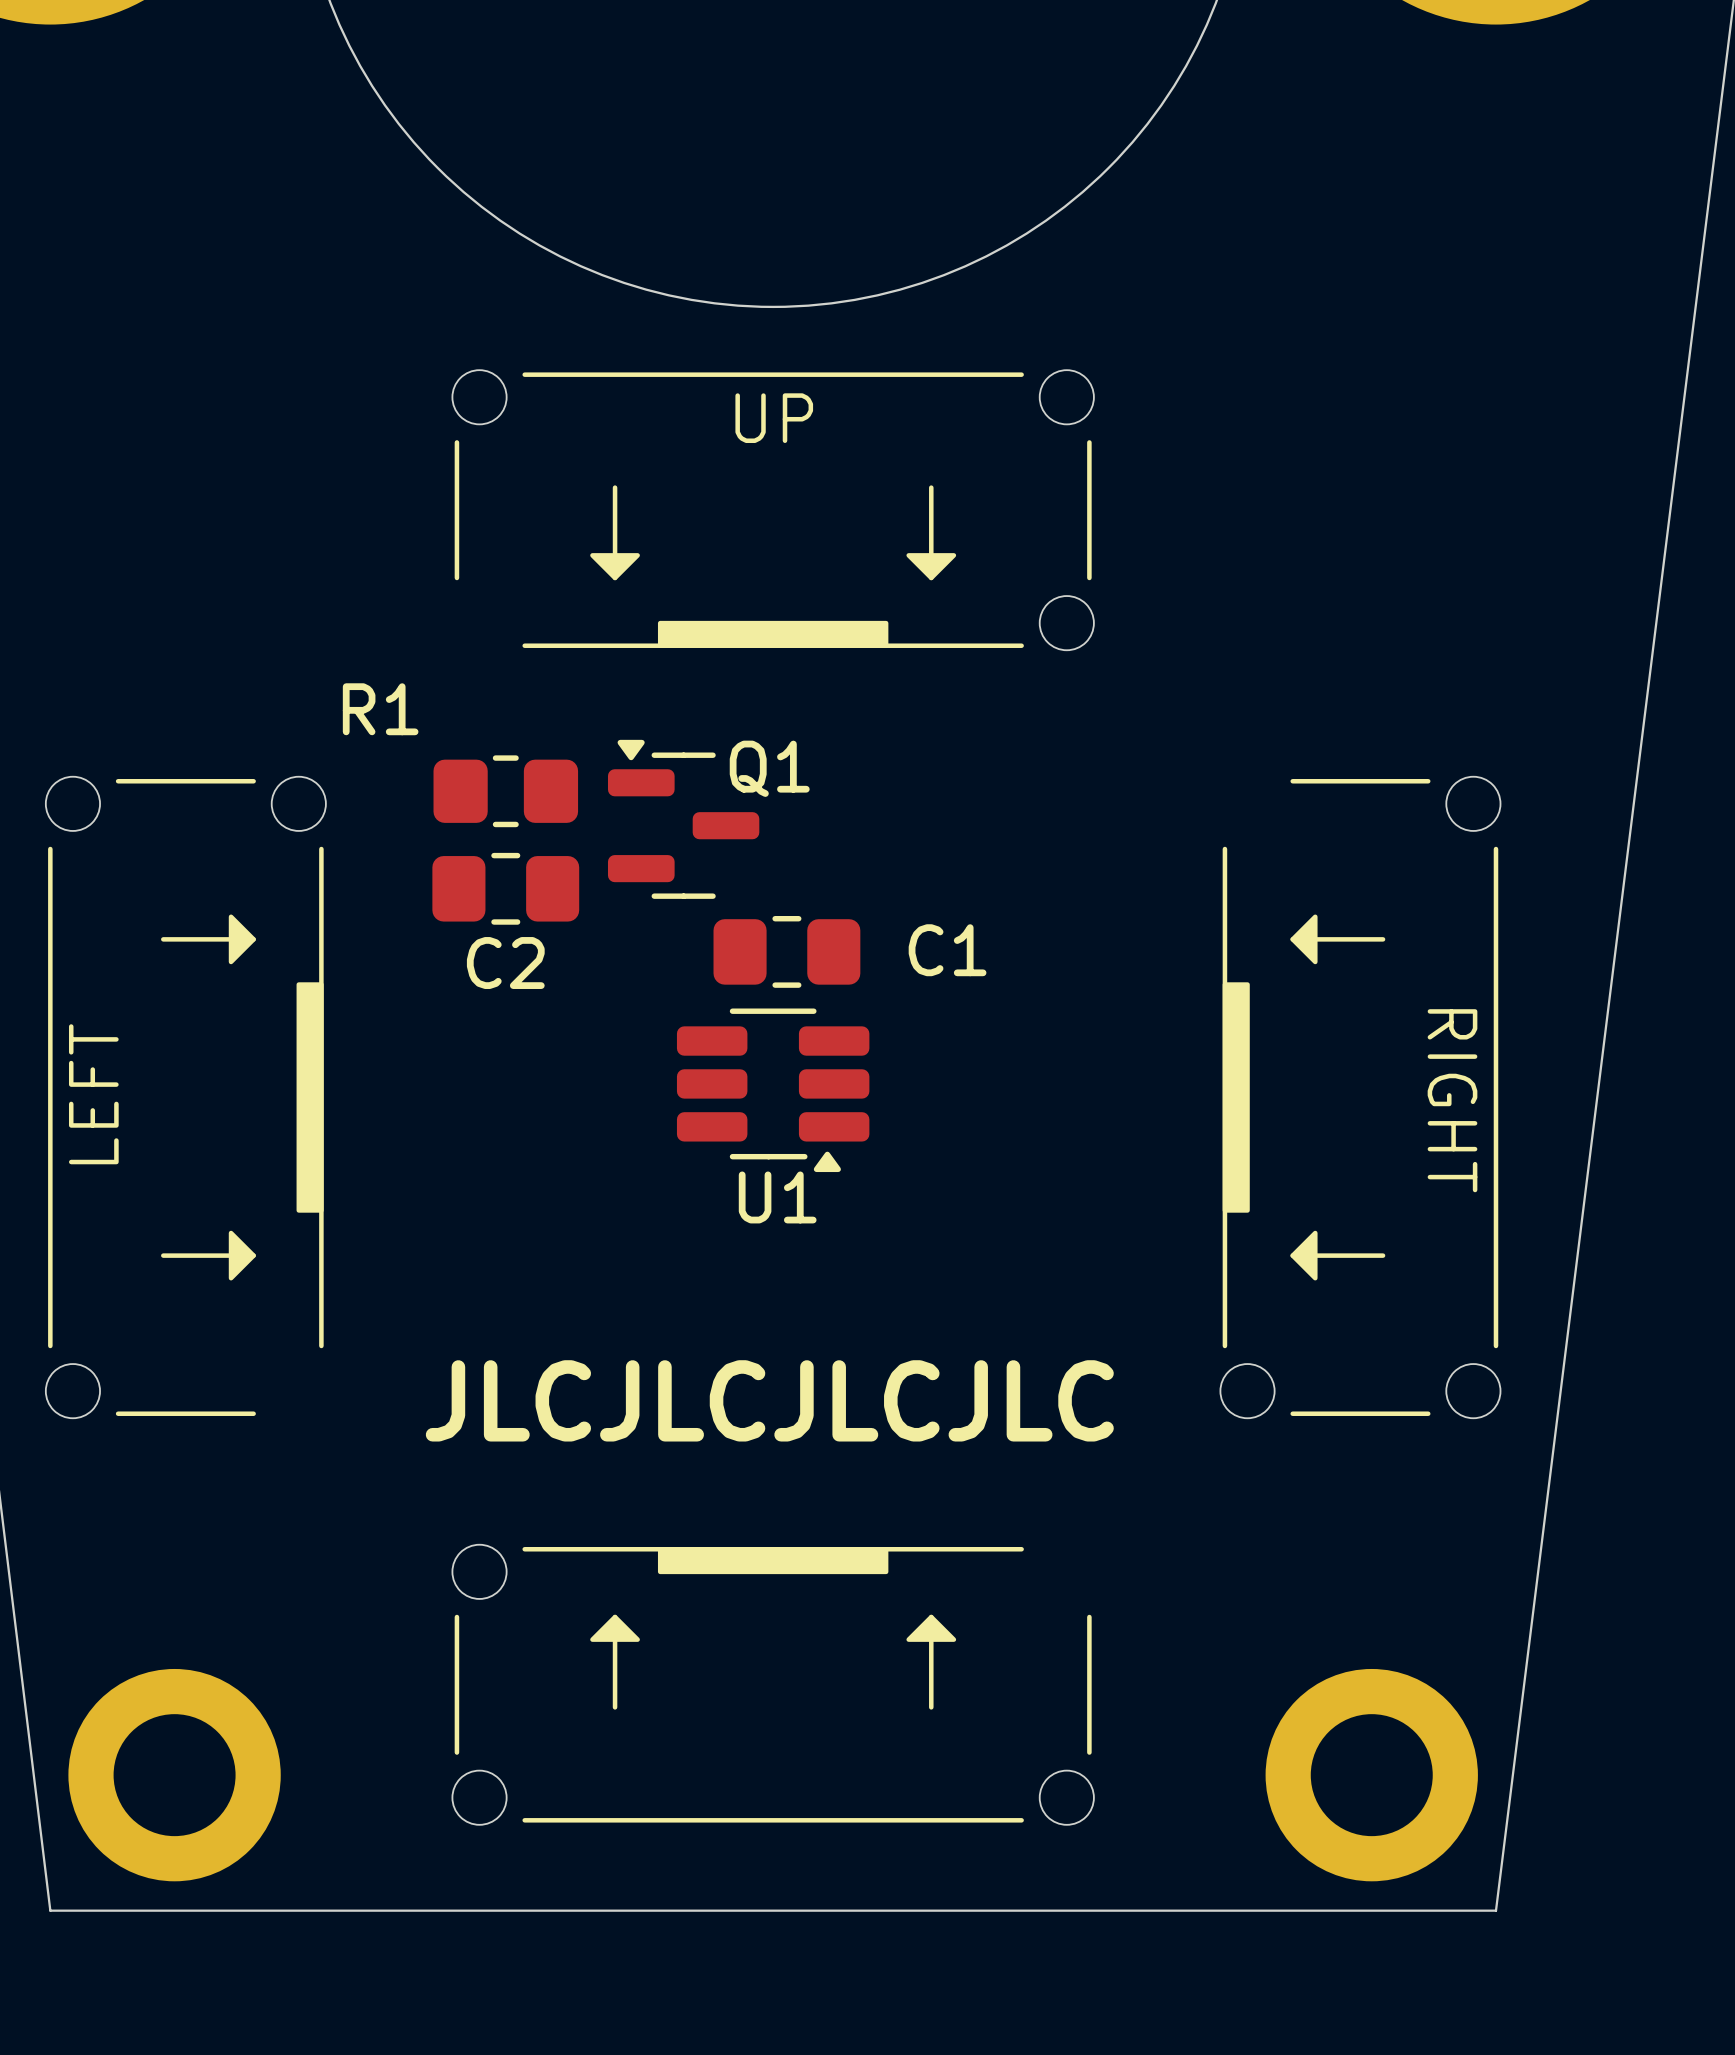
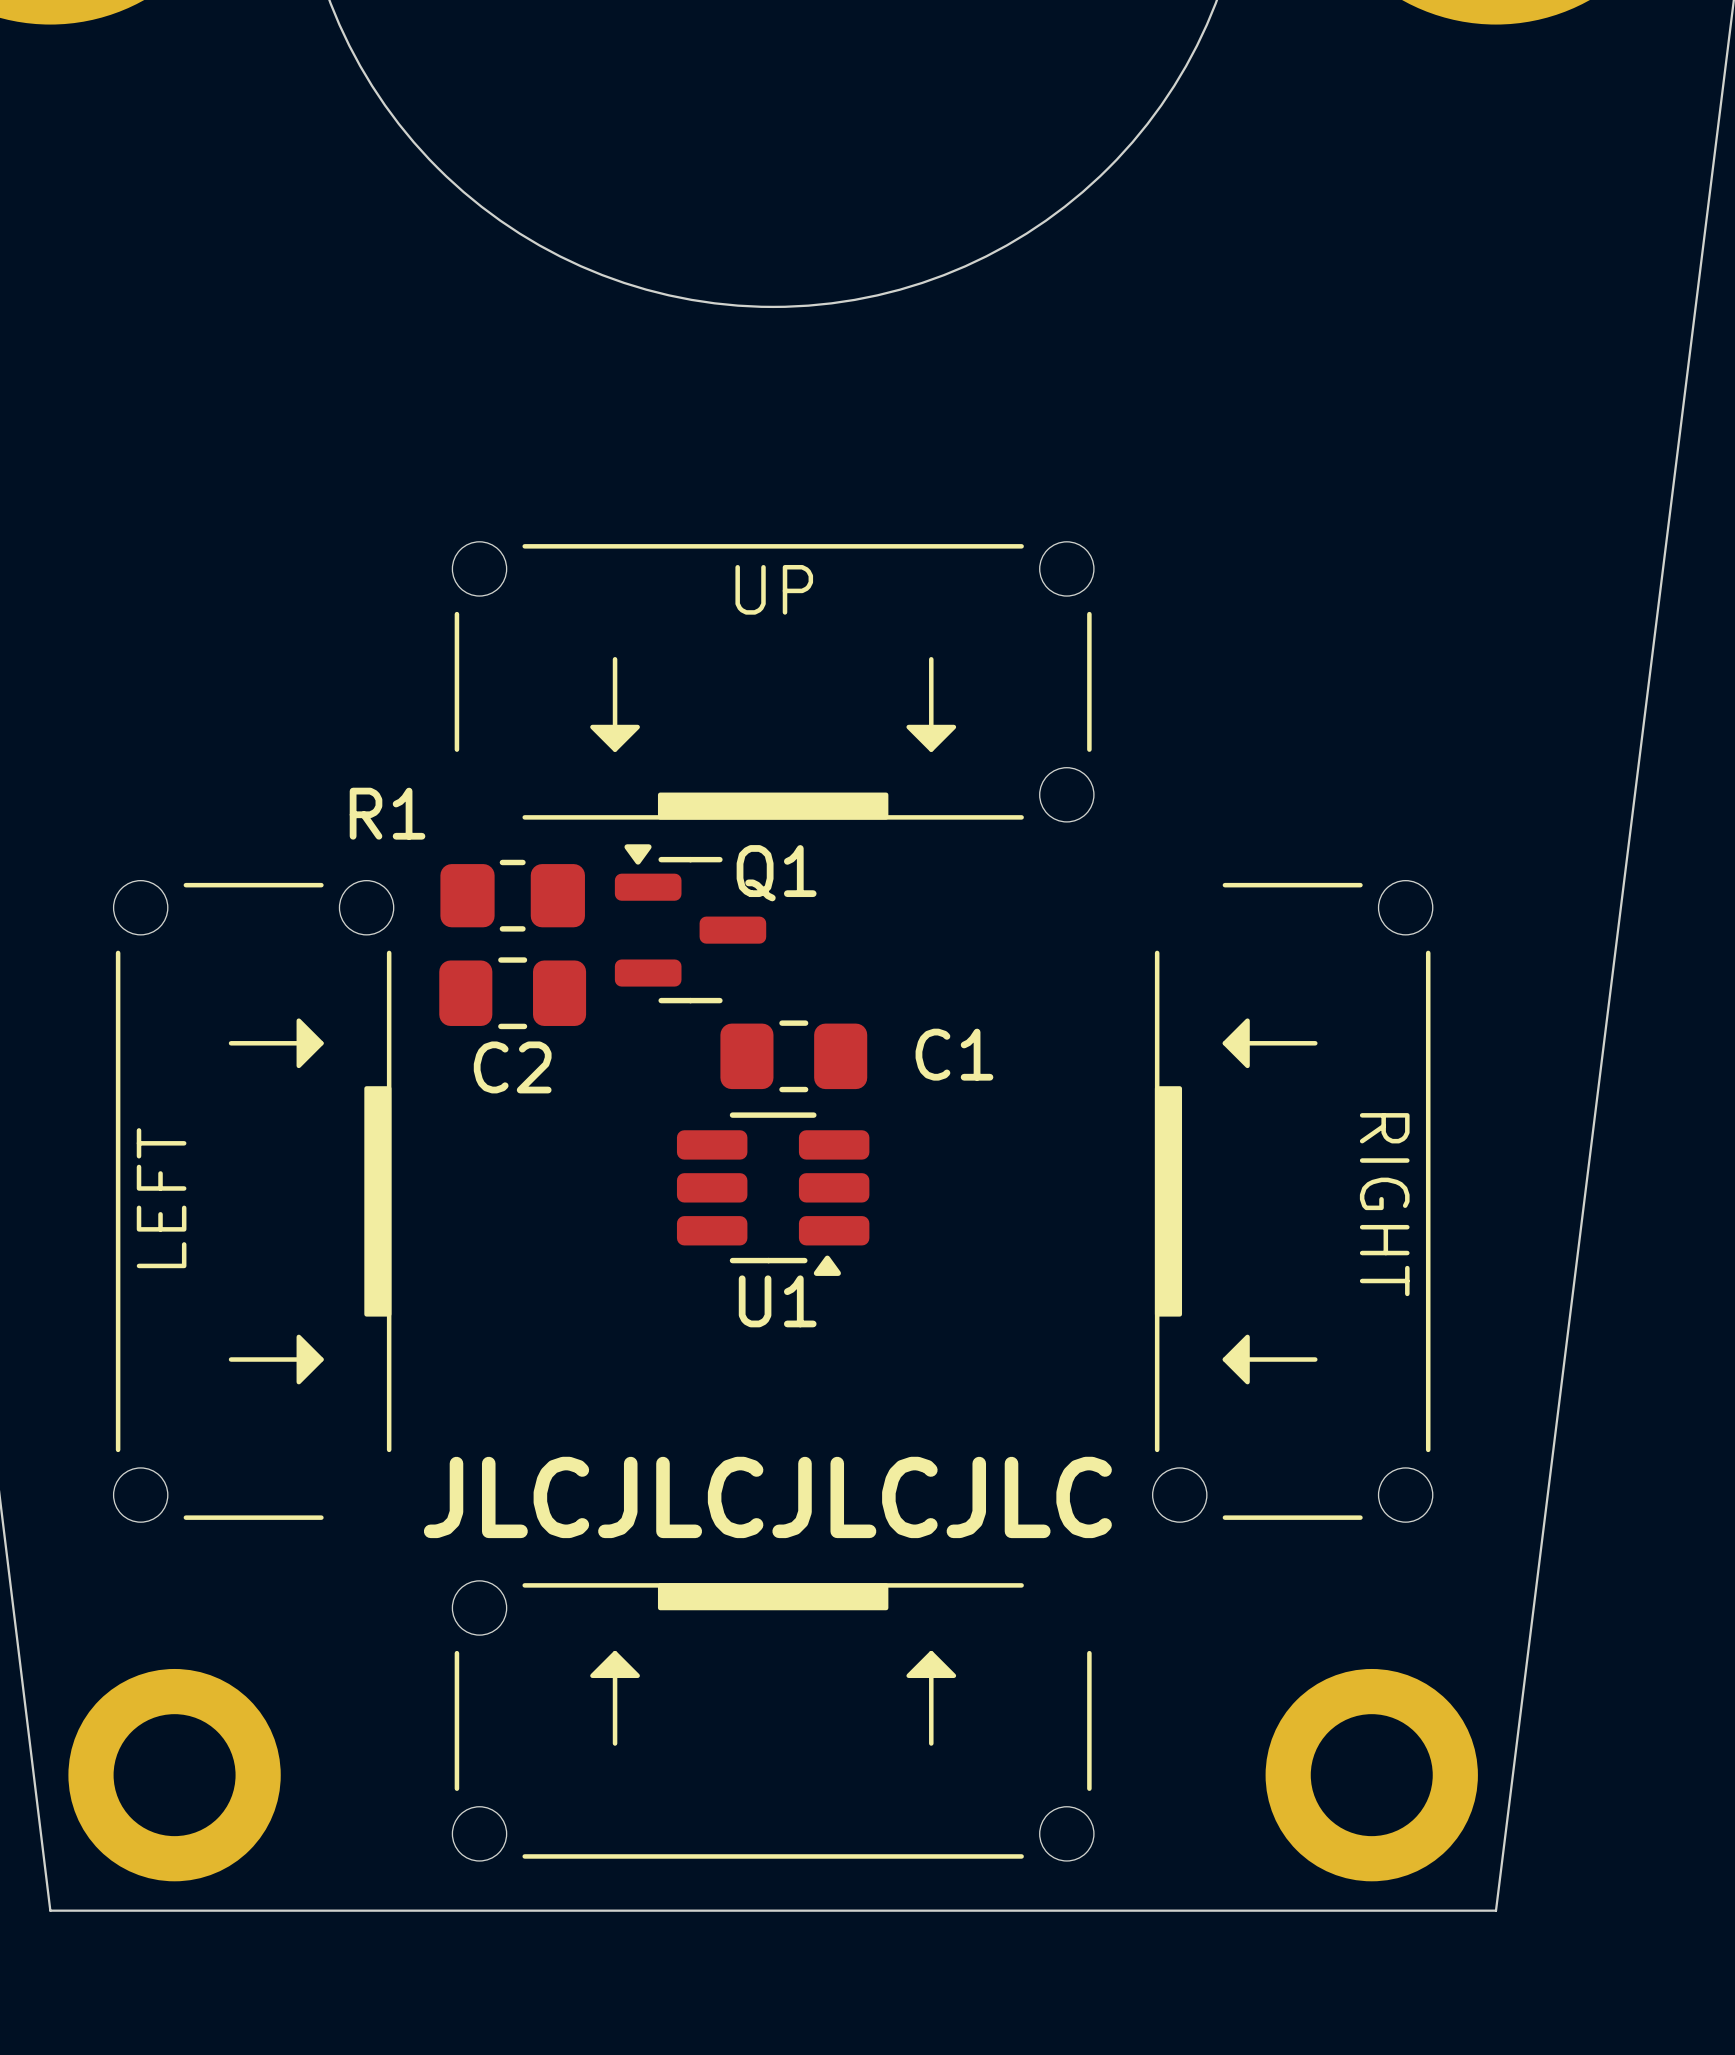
UP position: (773, 510) -> (773, 681)
R1 position: (505, 791) -> (512, 895)
Q1 position: (683, 819) -> (690, 923)
C2 position: (505, 888) -> (512, 993)
C1 position: (786, 951) -> (793, 1056)
U1 position: (773, 1090) -> (773, 1194)
LEFT position: (185, 1097) -> (253, 1201)
RIGHT position: (1360, 1097) -> (1292, 1201)
text position: JLCJLCJLCJLC (769, 1400) -> JLCJLCJLCJLC (767, 1497)
part position: (773, 1684) -> (773, 1720)

